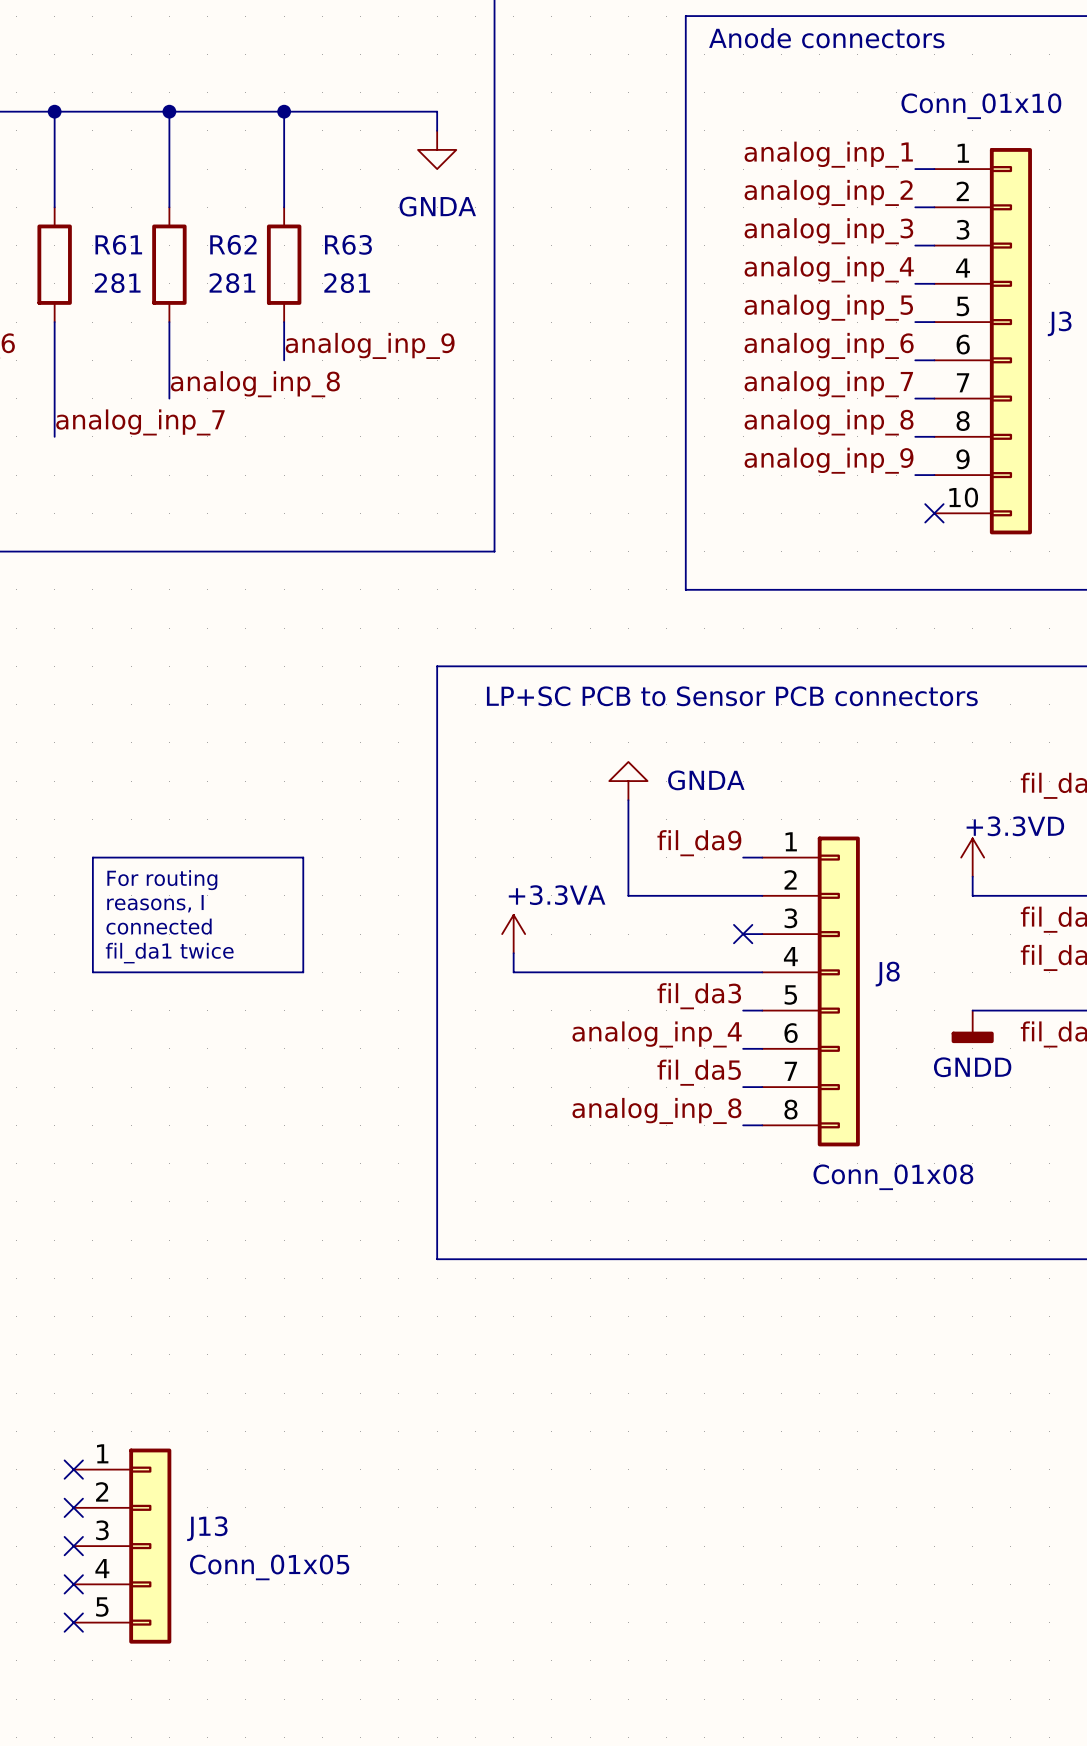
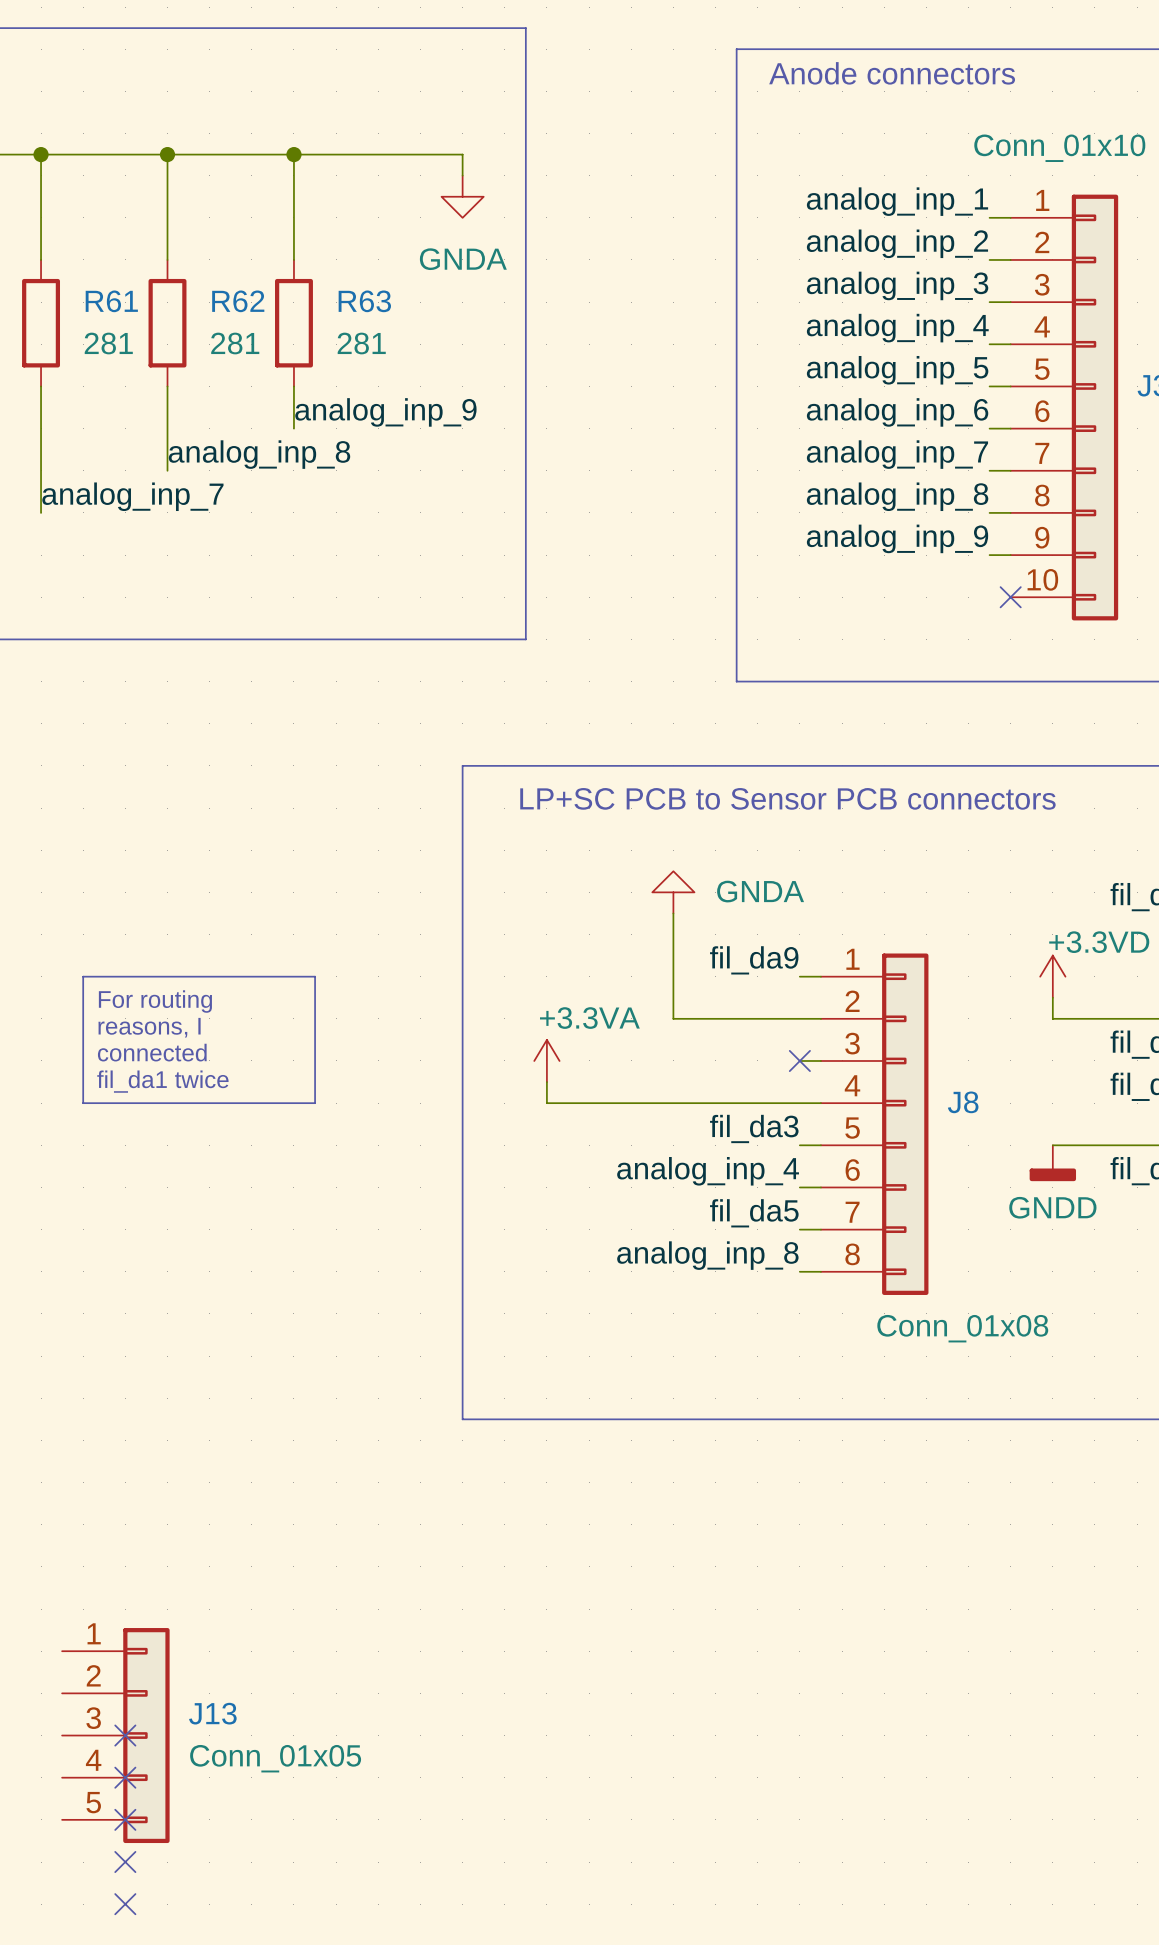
no-connect mark: (73, 1469) -> none
no-connect mark: (73, 1507) -> none
no-connect mark: (73, 1546) -> none
no-connect mark: none -> (125, 1735)
no-connect mark: (73, 1584) -> none
no-connect mark: none -> (125, 1777)
no-connect mark: (73, 1622) -> none
no-connect mark: none -> (125, 1819)
no-connect mark: none -> (125, 1862)
no-connect mark: none -> (125, 1904)

